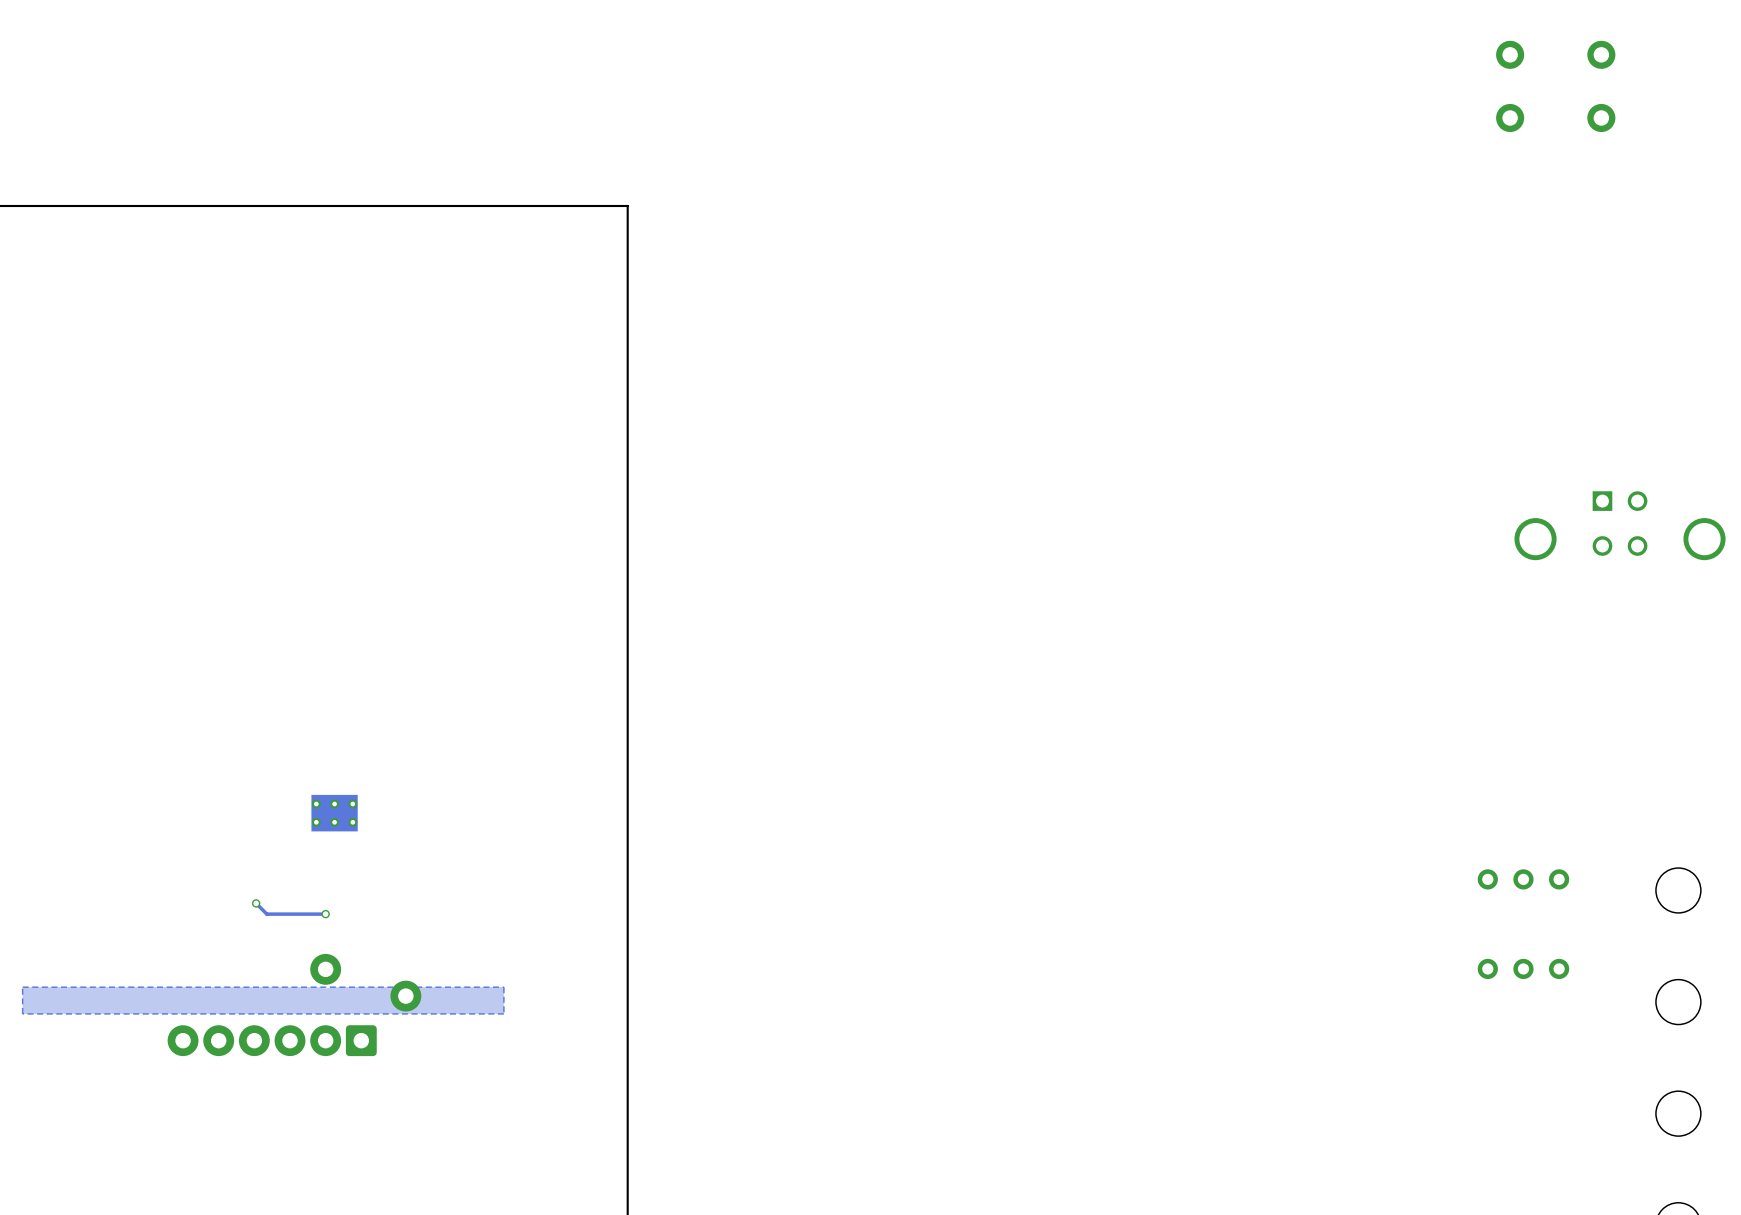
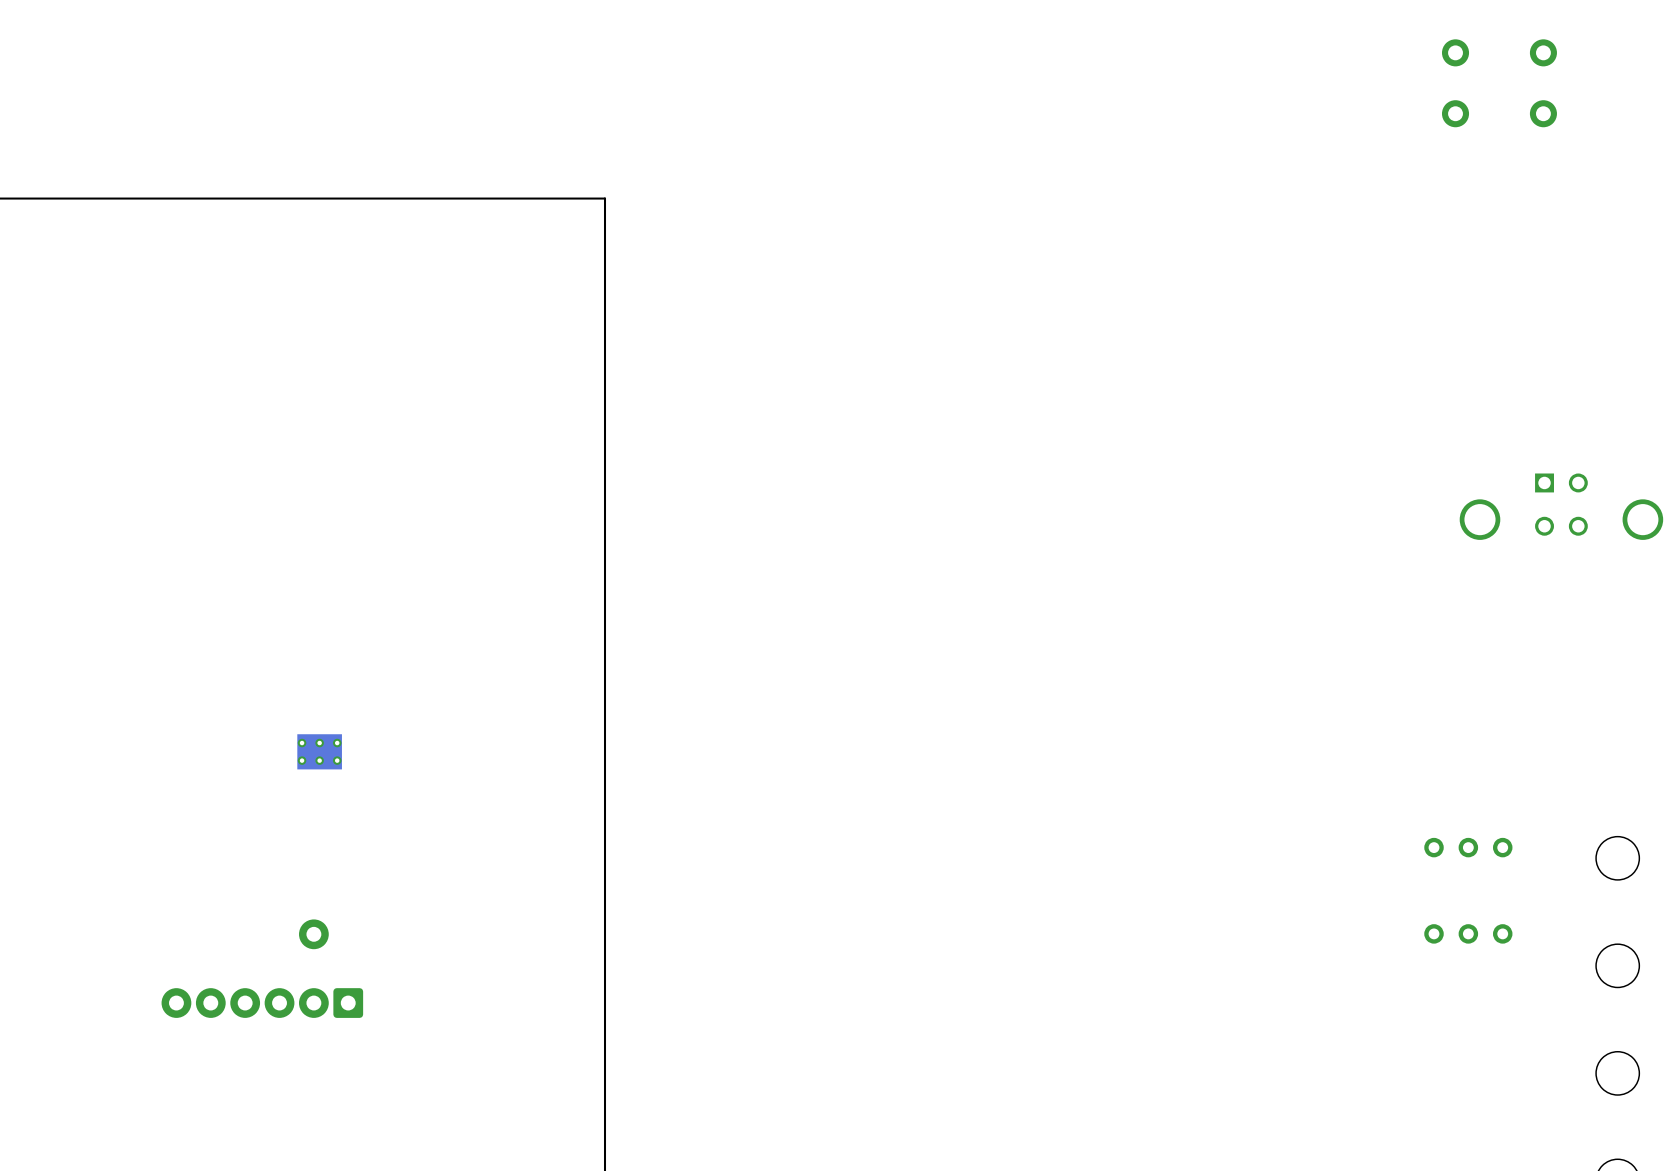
part position: (334, 813) -> (319, 751)
track: (256, 903) (266, 914) (325, 914) -> none
via: (256, 903) -> none
via: (325, 914) -> none
zone outline: (503, 987) (22, 987) (22, 1013) (503, 1013) (503, 987) -> none
part: (405, 996) -> none

